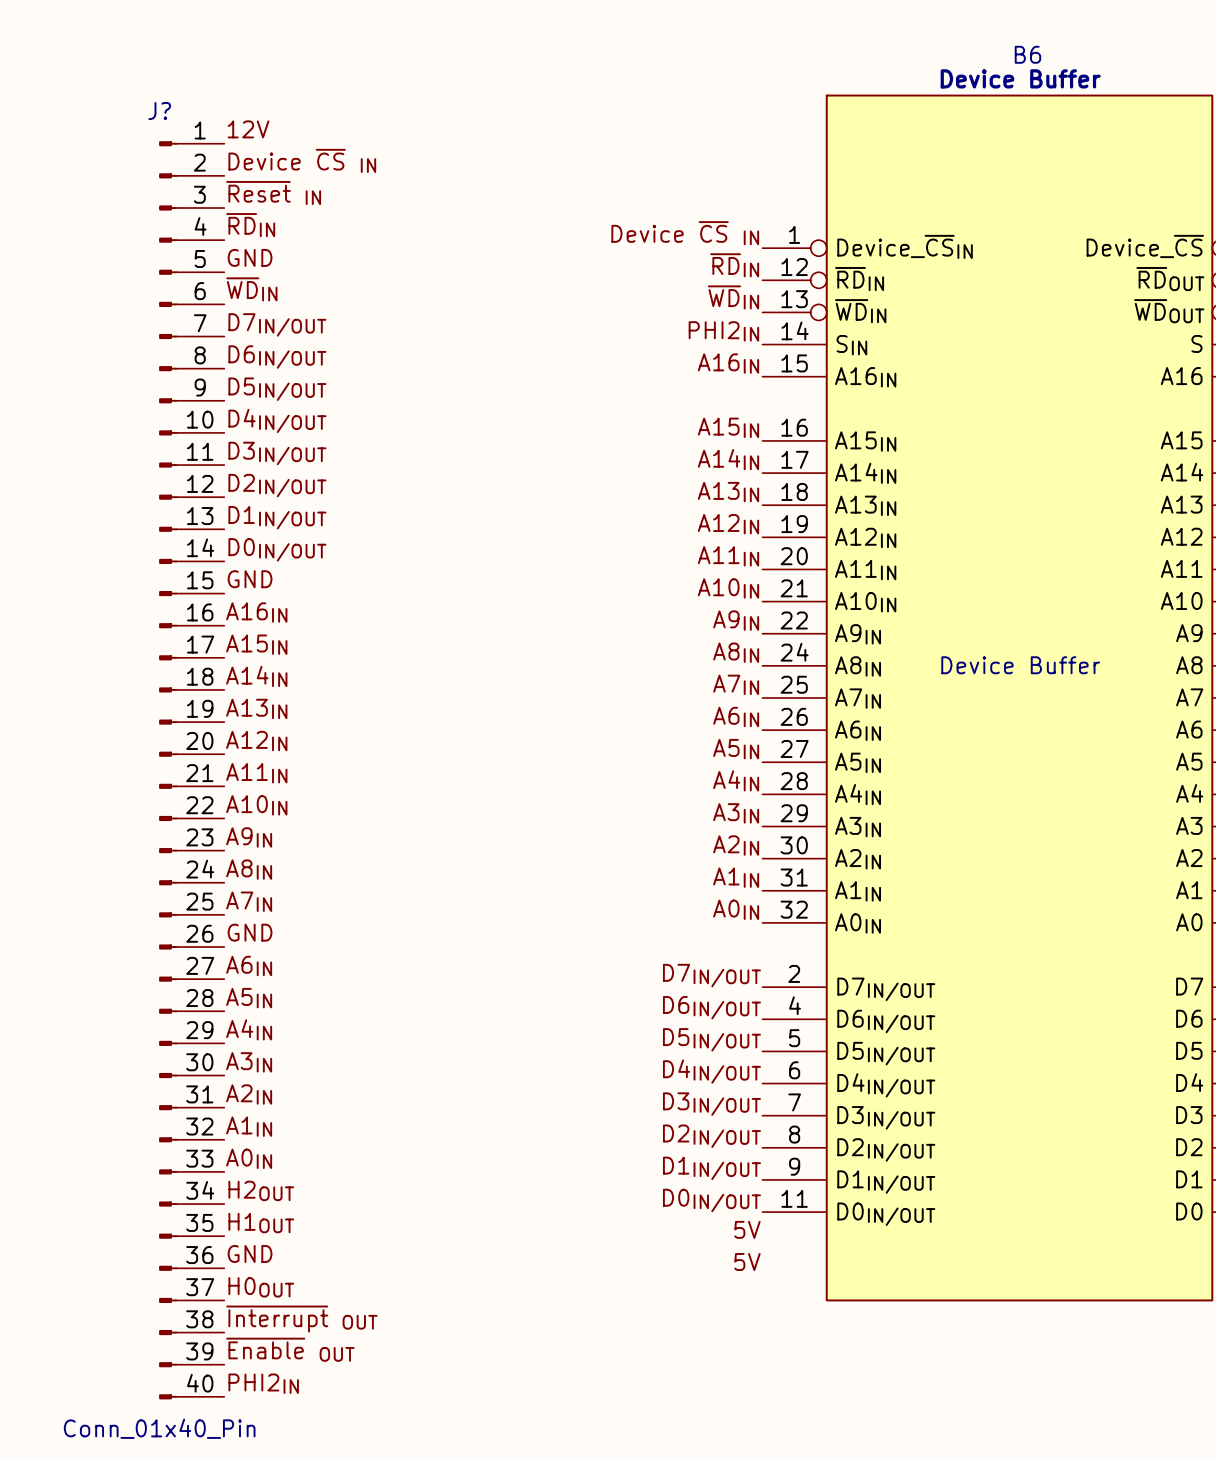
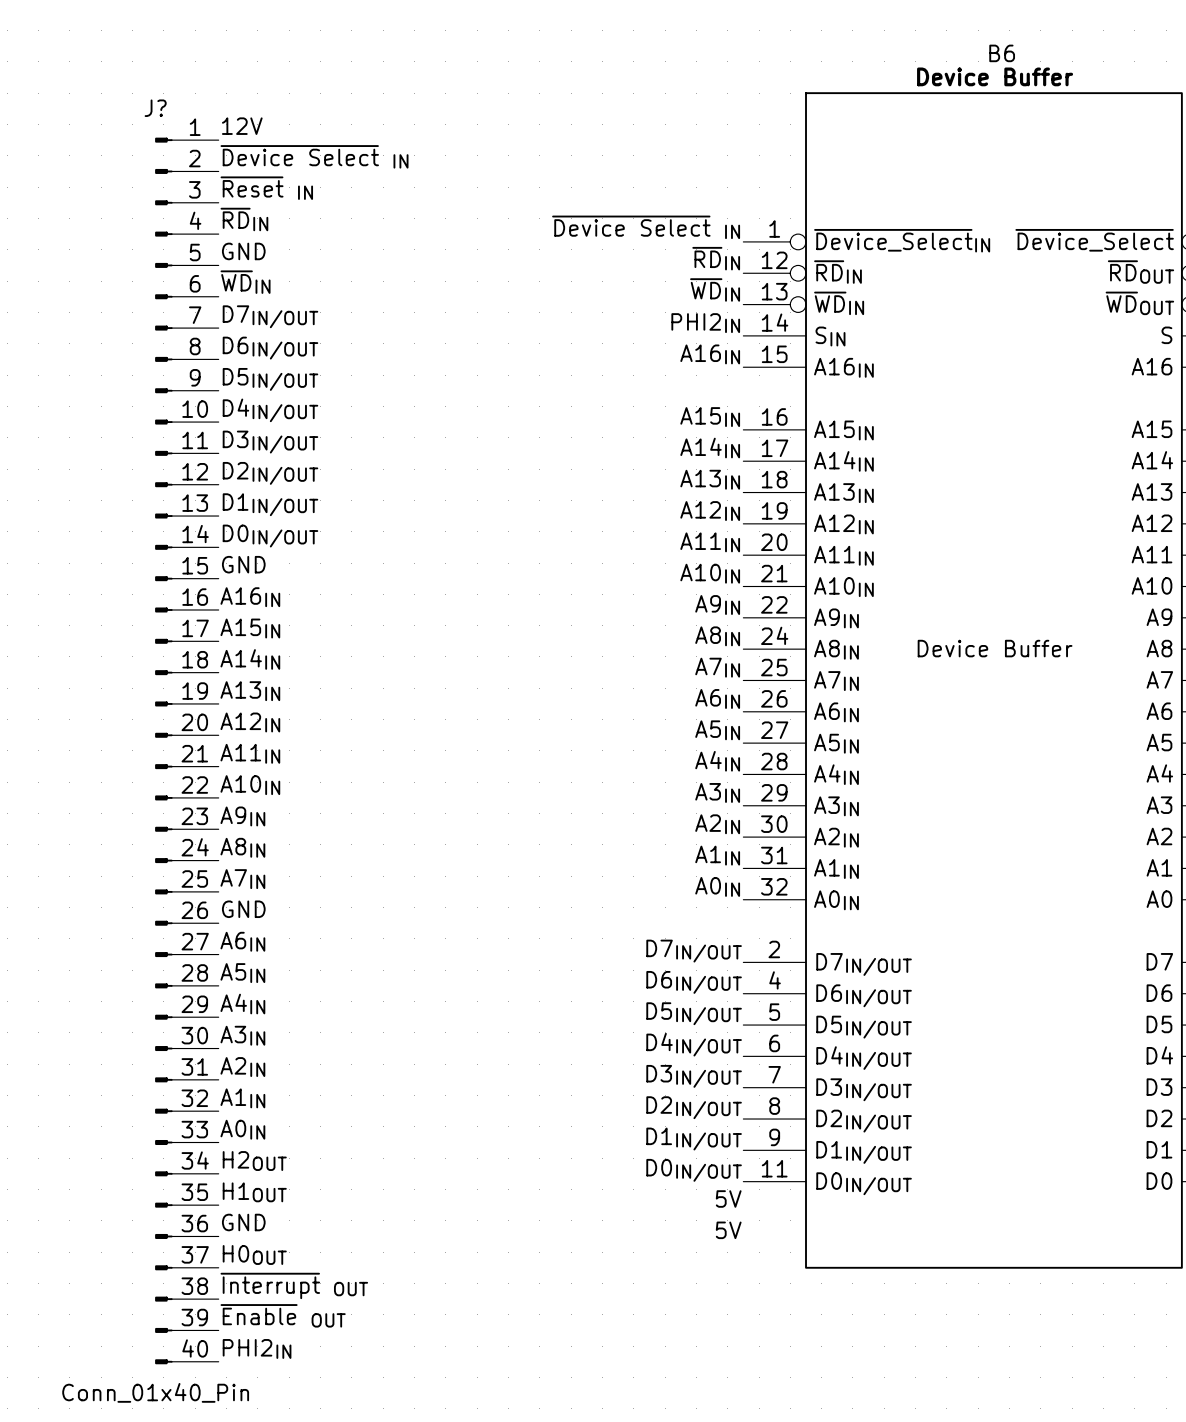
label: Device ~{CS} IN (302, 160) -> ~{Device Select} IN (314, 156)
label: Device ~{CS} IN (685, 233) -> ~{Device Select} IN (646, 227)
B6 pin name: Device_~{CS}IN (905, 246) -> ~{Device_Select}IN (902, 240)
B6 pin name: Device_~{CS} (1145, 246) -> ~{Device_Select} (1094, 240)

